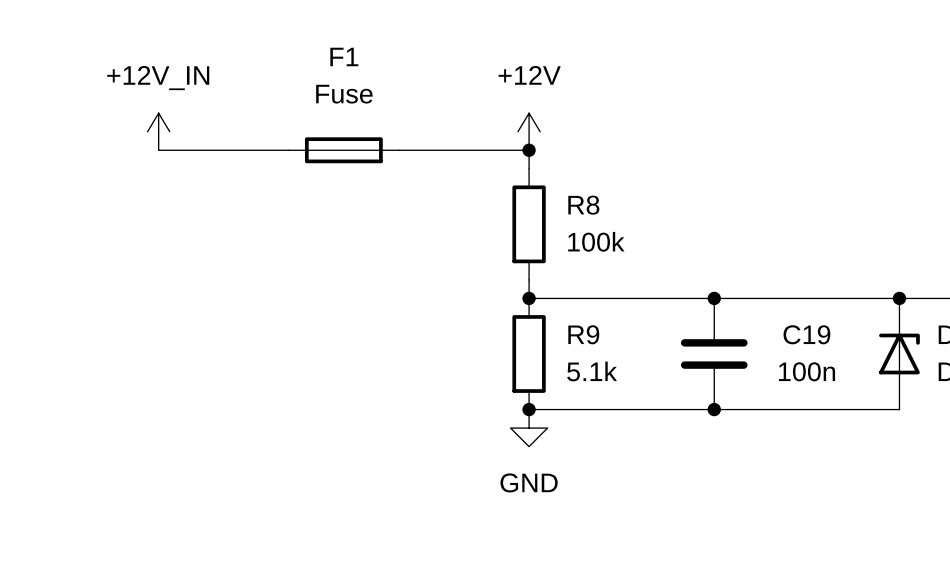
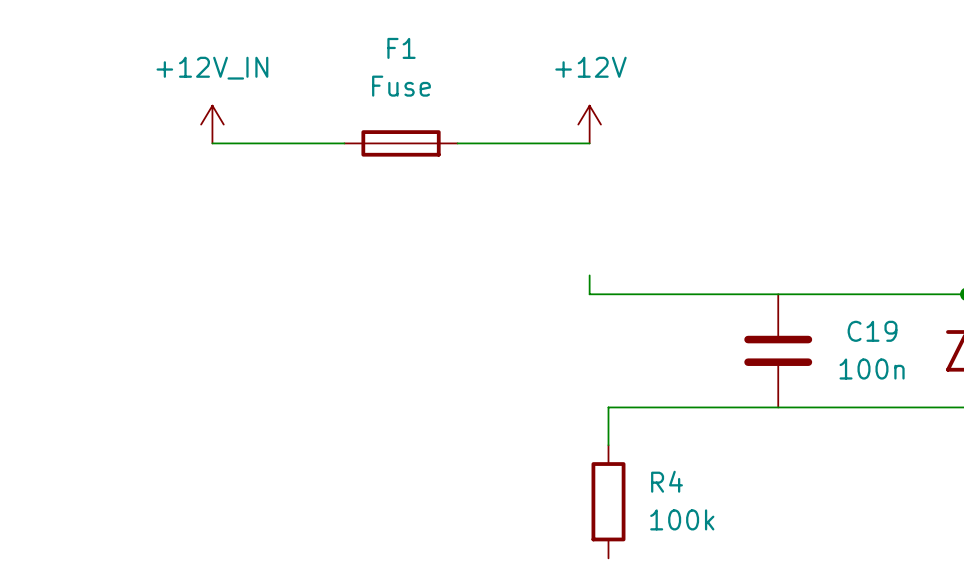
wire: (529, 150) (529, 168) -> none
junction: (529, 150) -> none
R8: 100k (529, 224) -> none
junction: (529, 298) -> none
junction: (714, 298) -> none
R9: 5.1k (529, 353) -> none
wire: (529, 409) (547, 409) -> (608, 445) (608, 407)
junction: (529, 409) -> none
junction: (714, 409) -> none
power symbol: GND (529, 428) -> none
R4: none -> 100k (608, 501)

